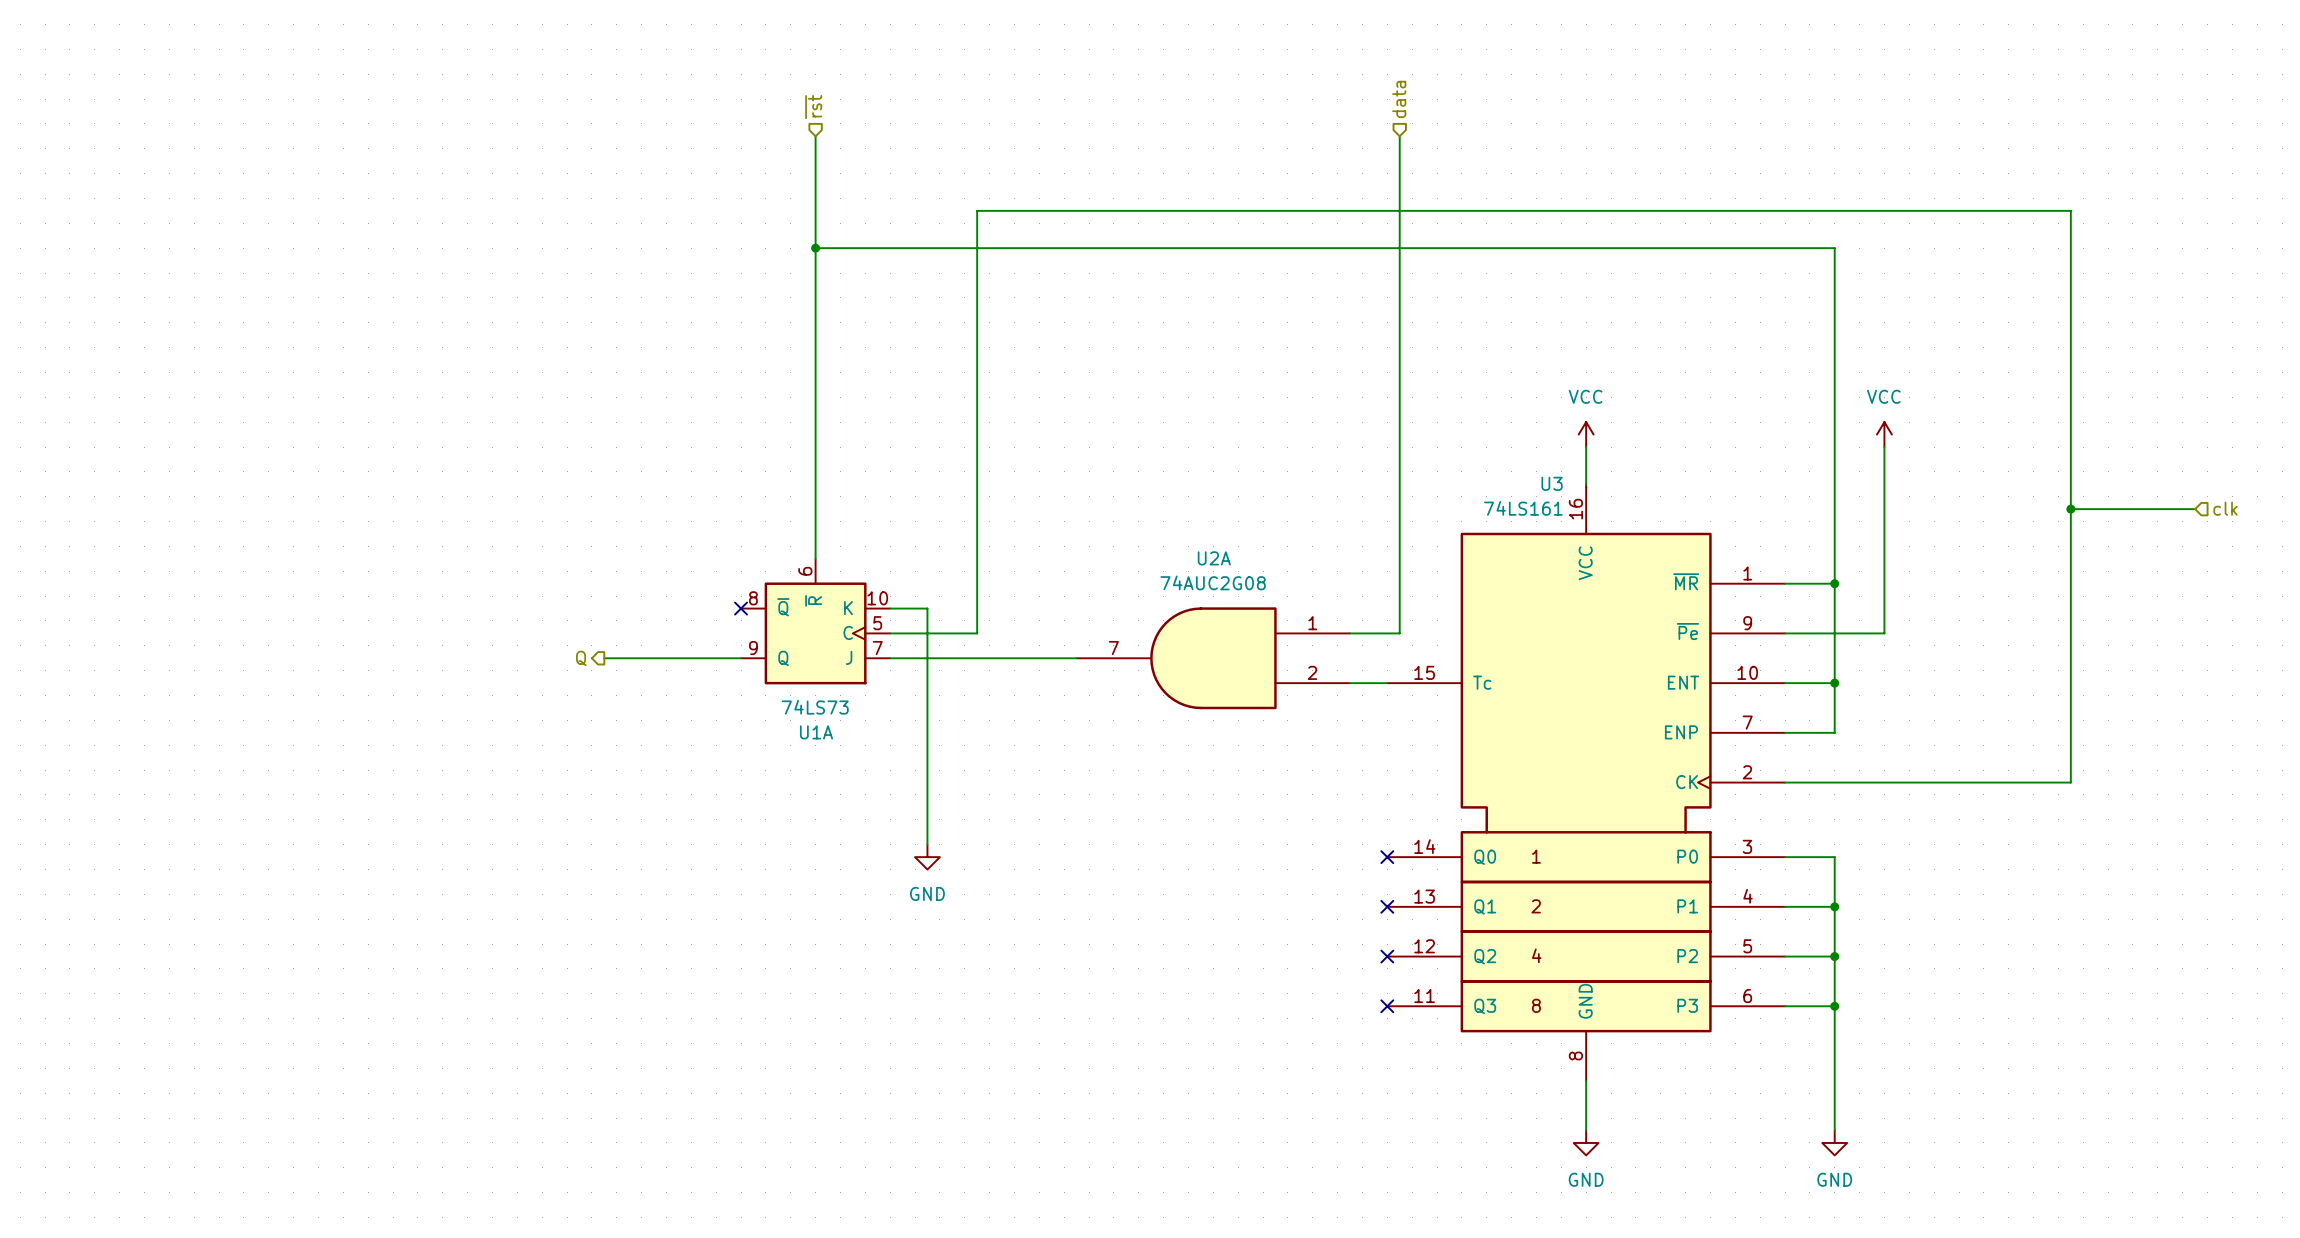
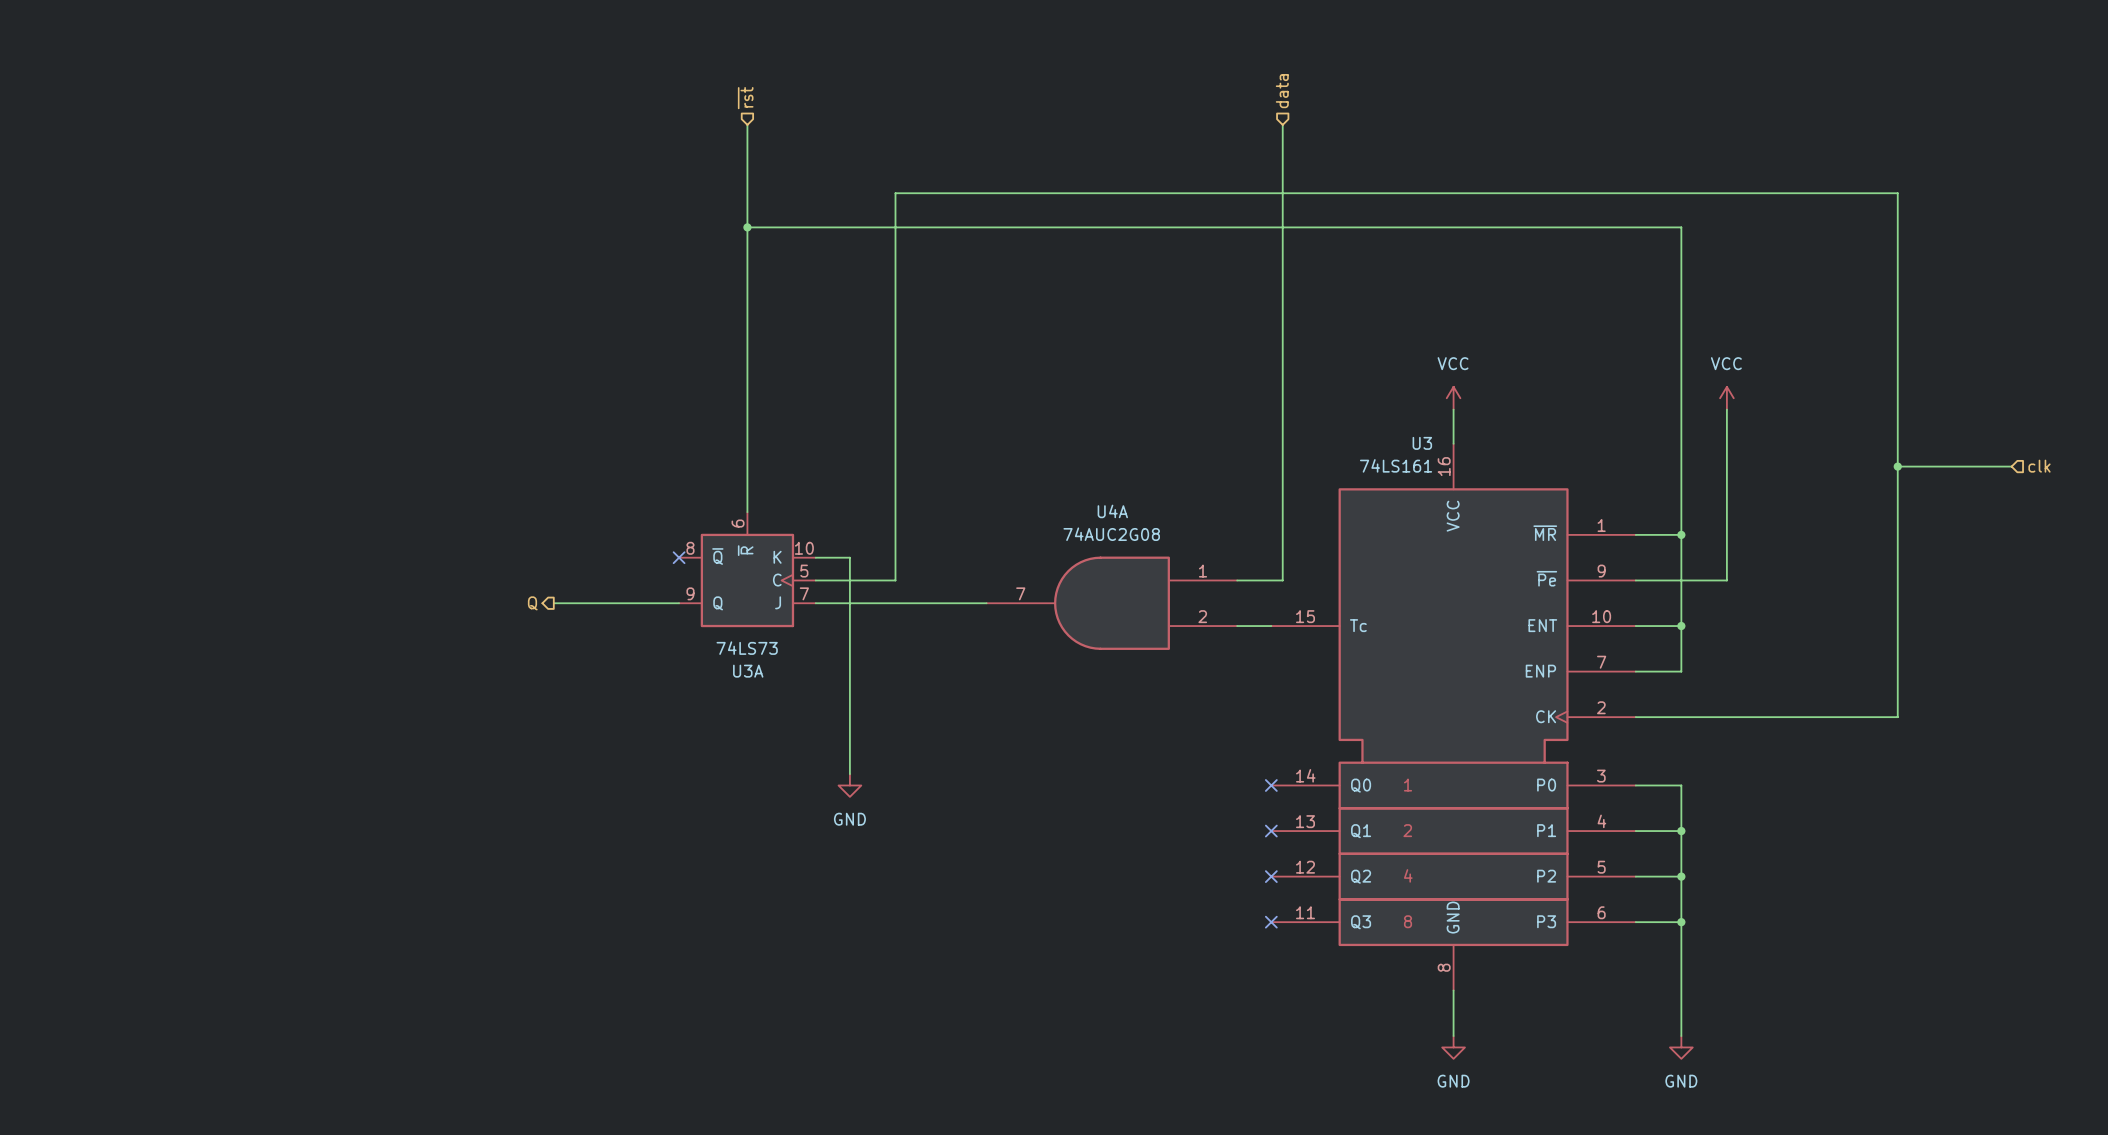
U2A name: U2A (1214, 558) -> U4A (1112, 511)
U1A name: U1A (816, 732) -> U3A (748, 671)

